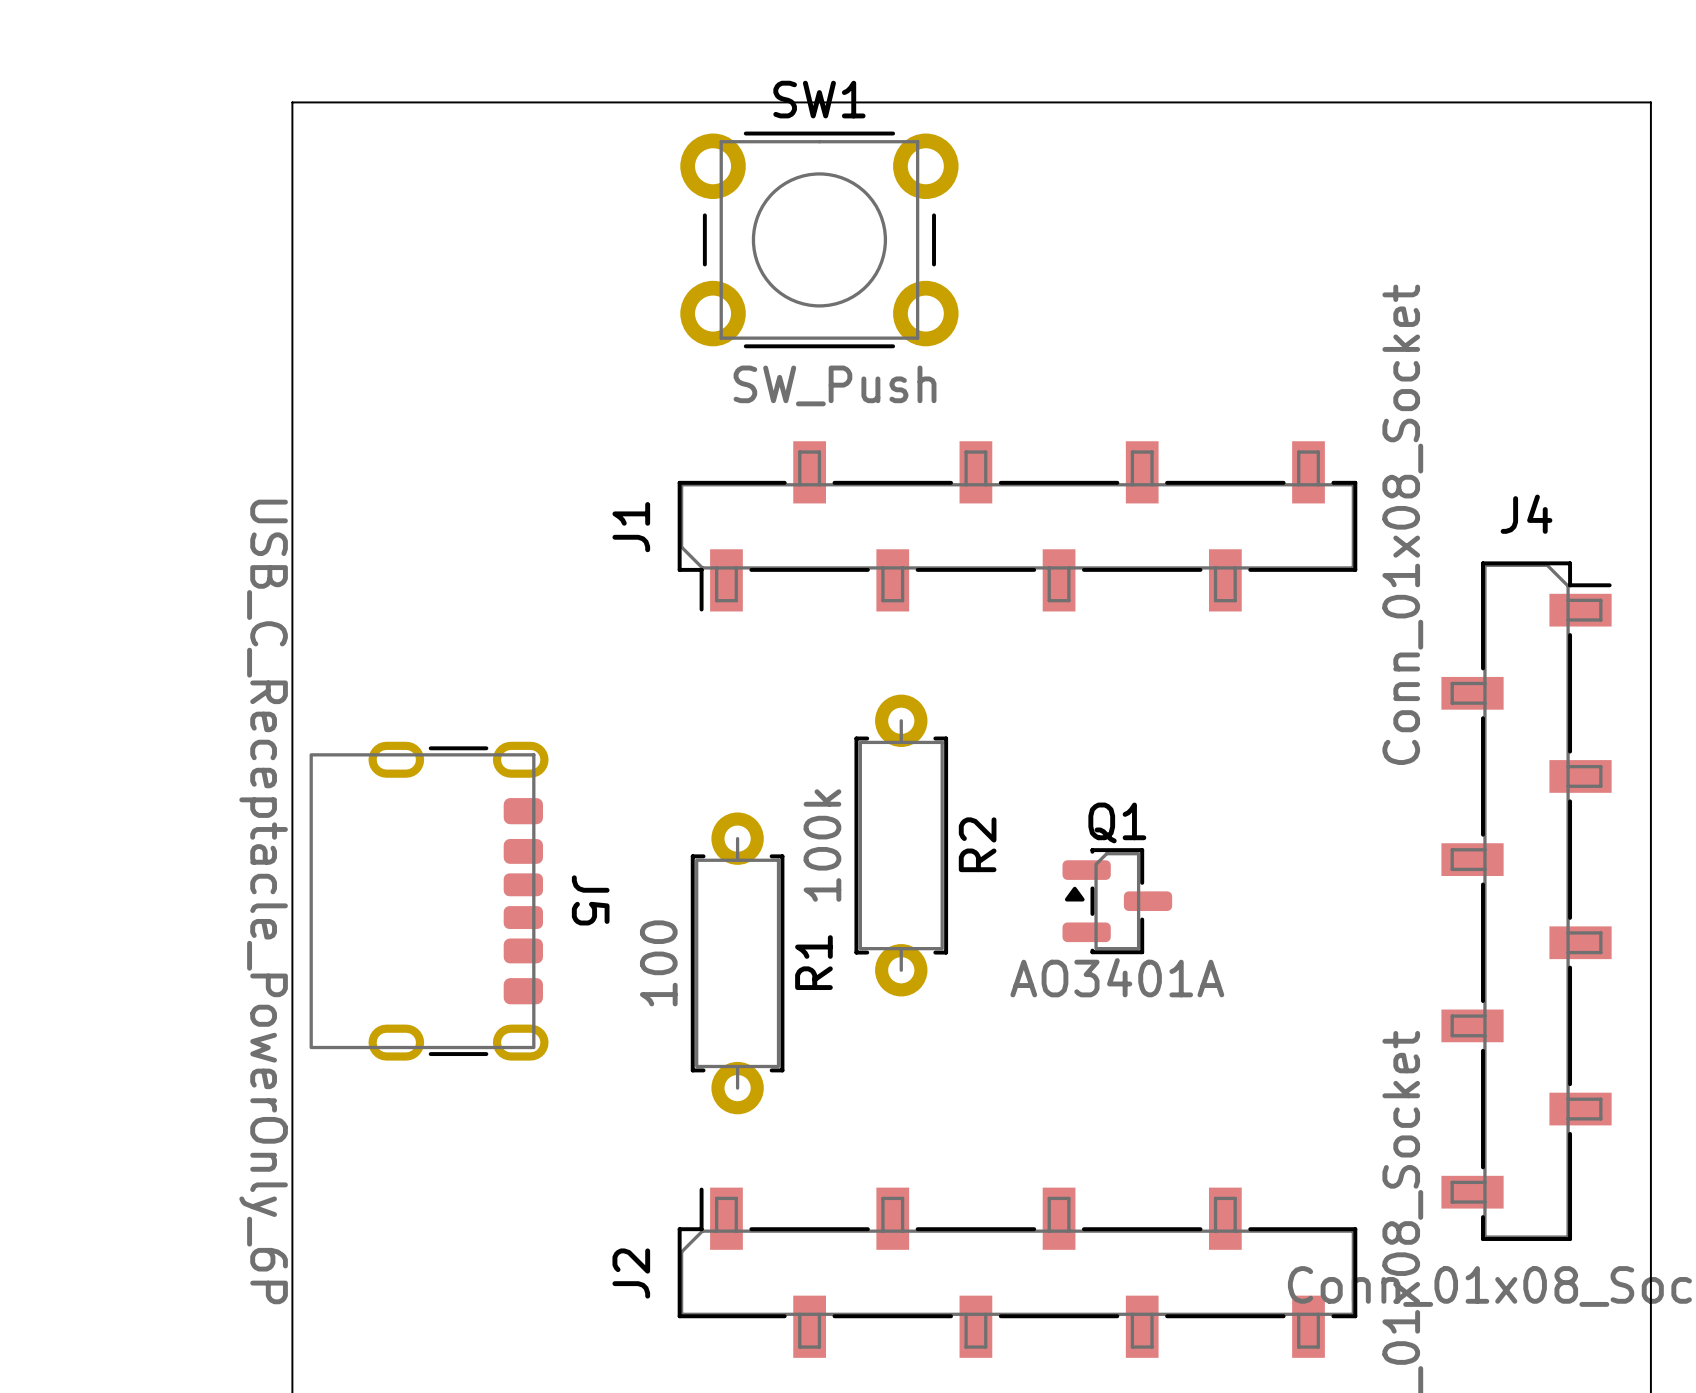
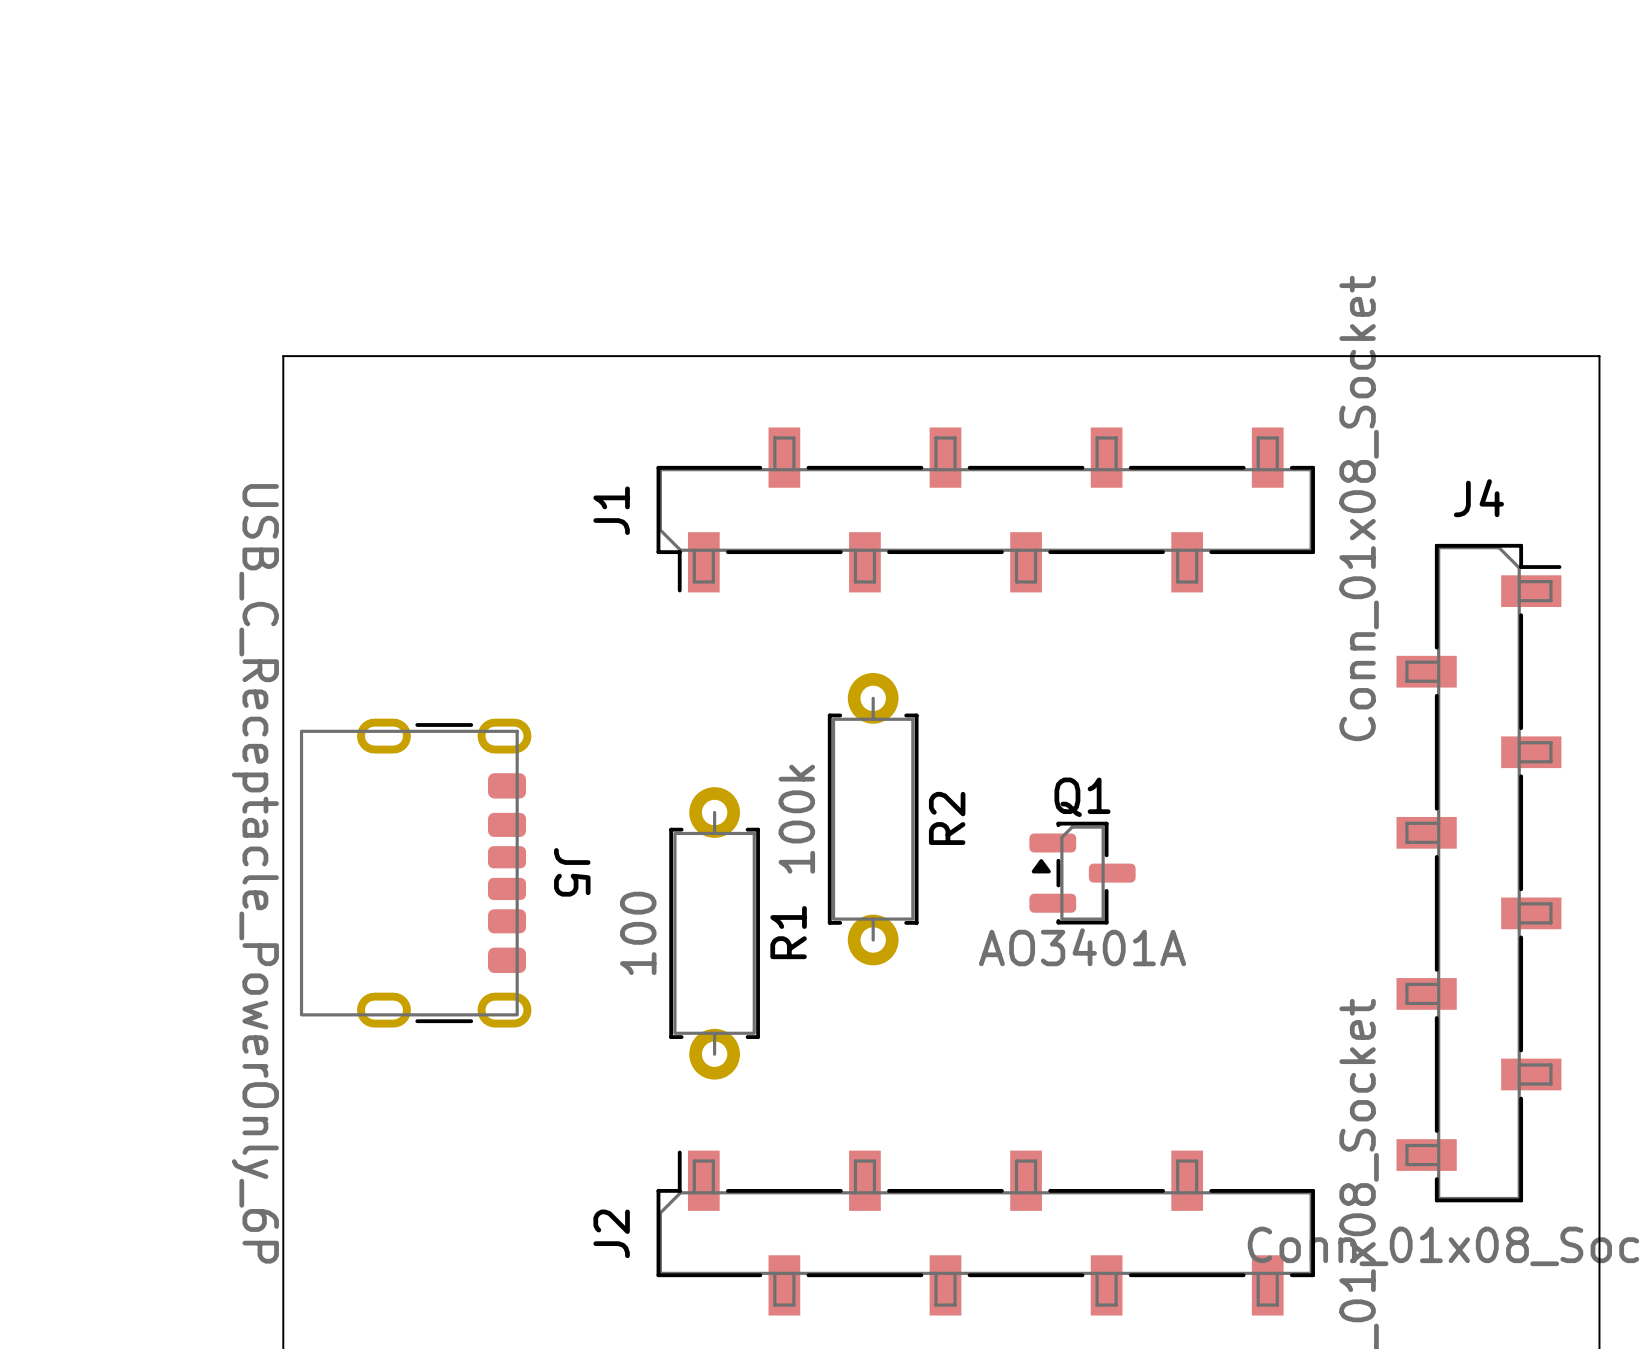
SW1: SW_Push (819, 239) -> none
board edge: (292, 367) (292, 102) (1650, 102) (1650, 367) -> (283, 356) (1599, 356)

